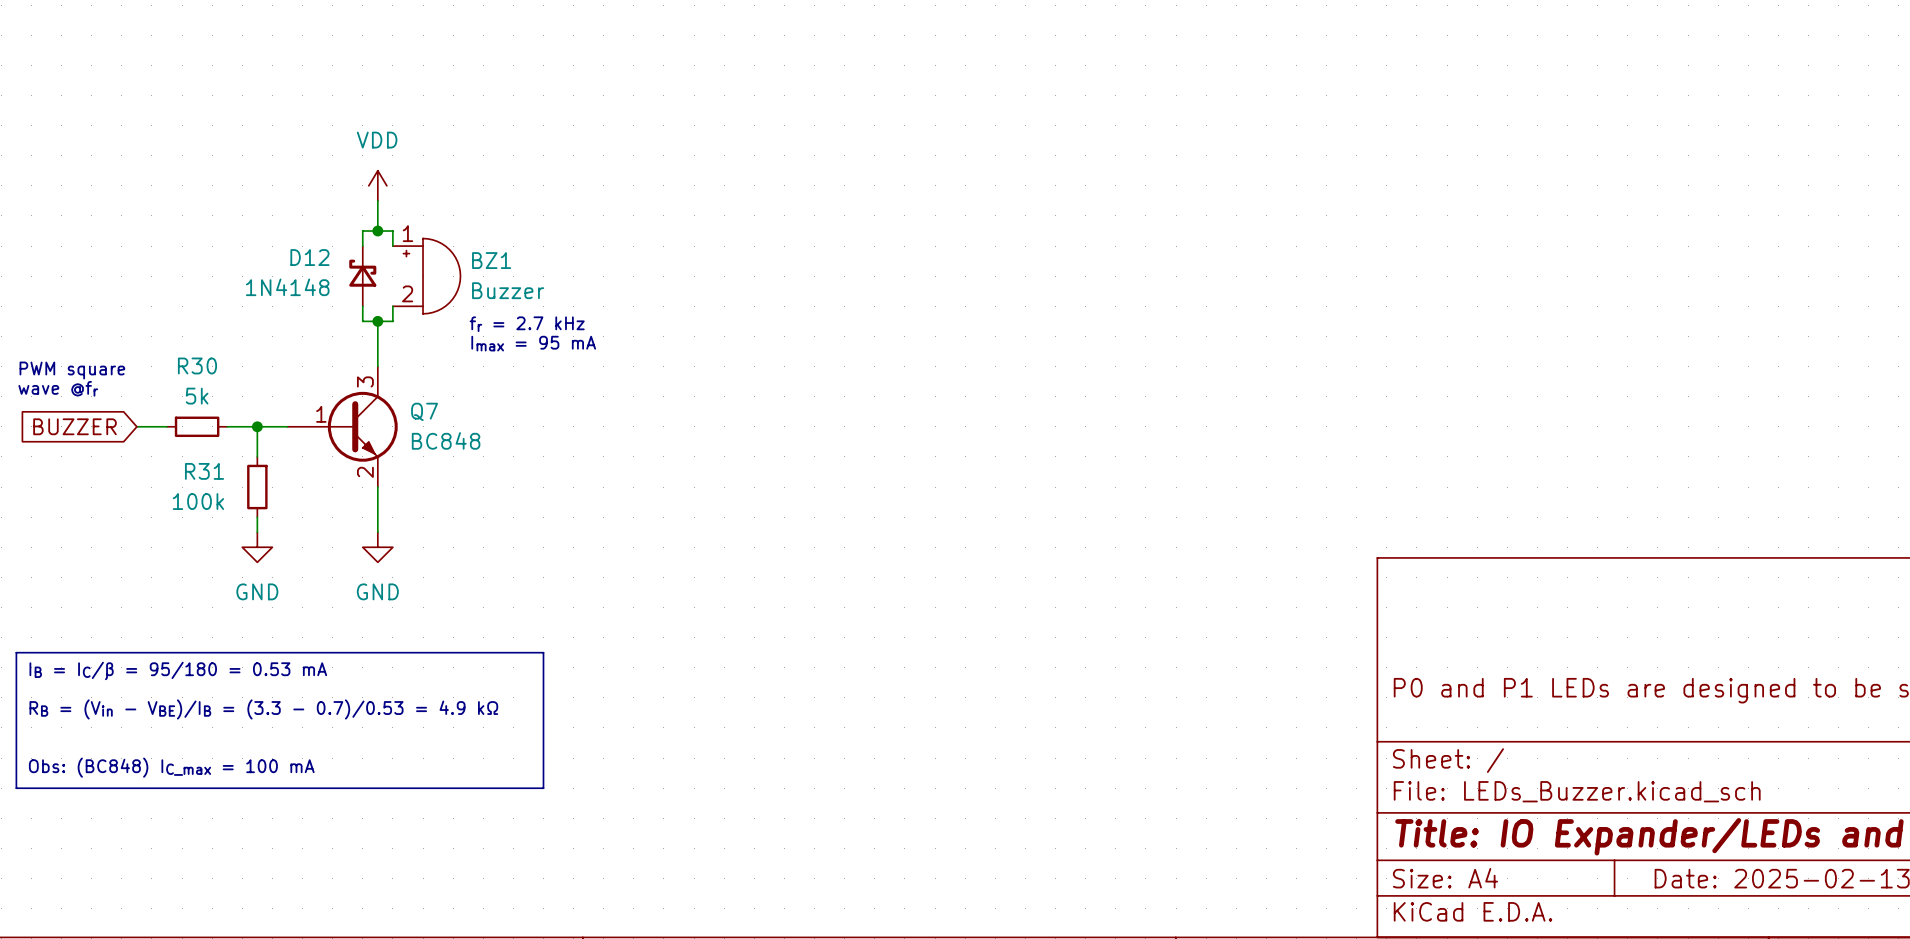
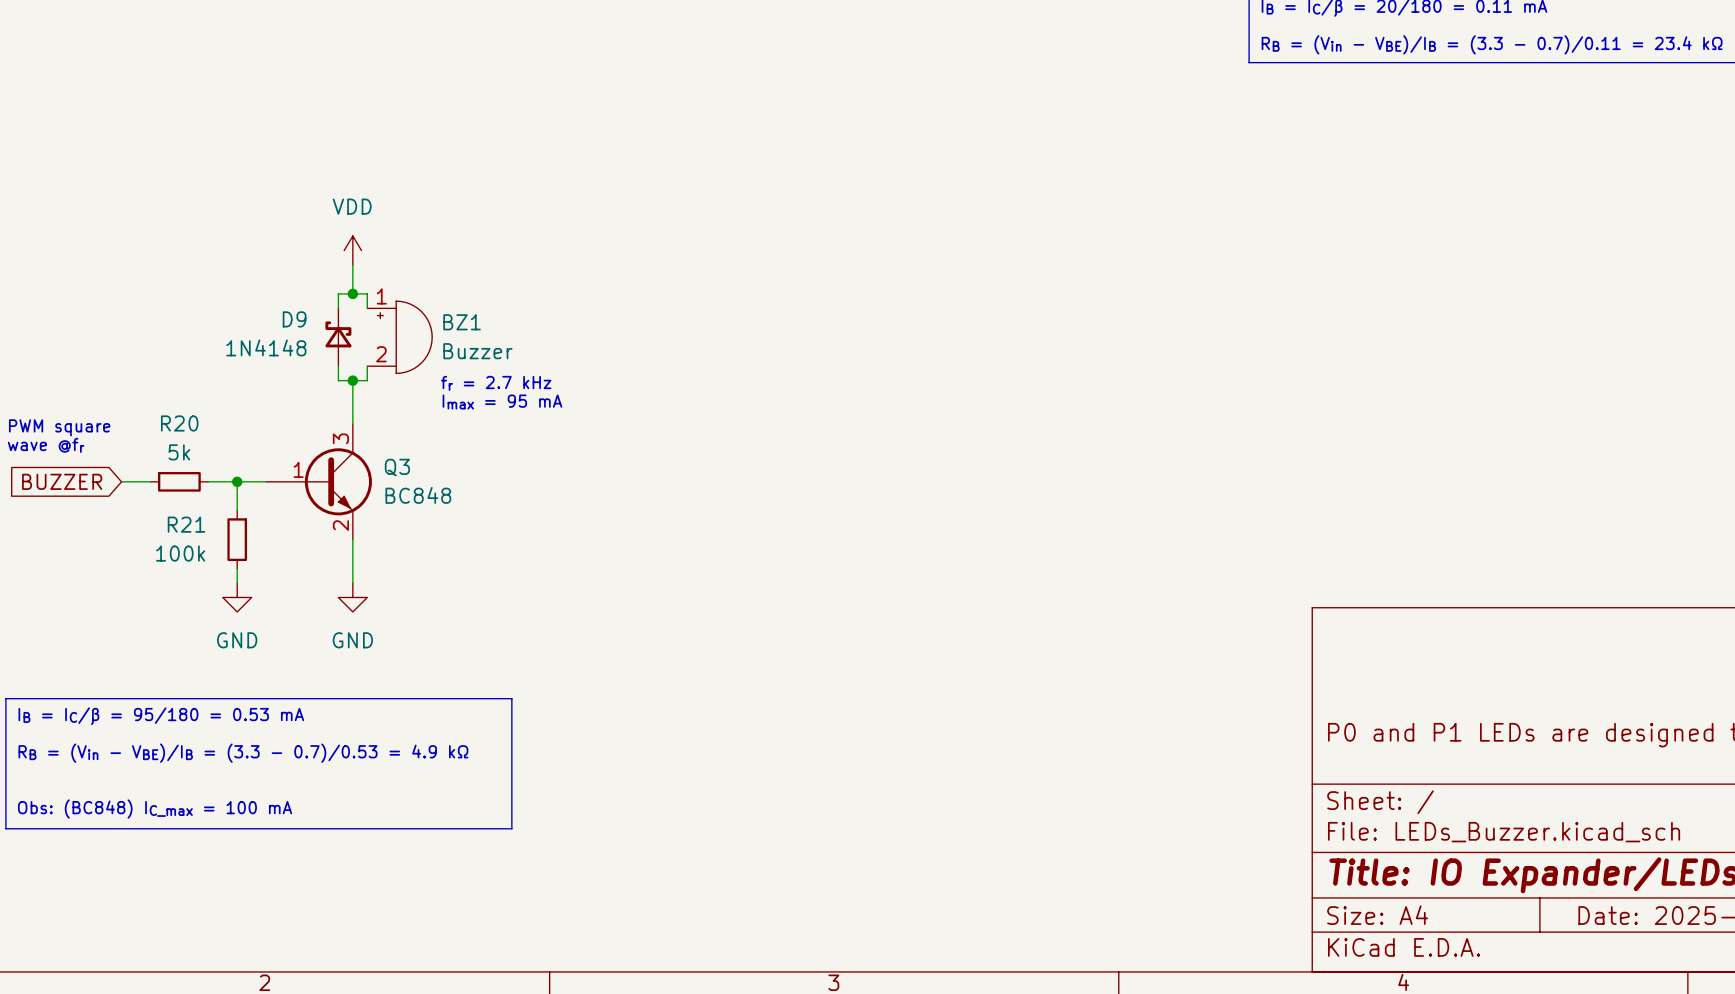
D12 name: D12 (309, 257) -> D9 (294, 319)
R30 name: R30 (197, 365) -> R20 (179, 423)
Q7 name: Q7 (424, 411) -> Q3 (397, 467)
R31 name: R31 (204, 471) -> R21 (186, 524)

